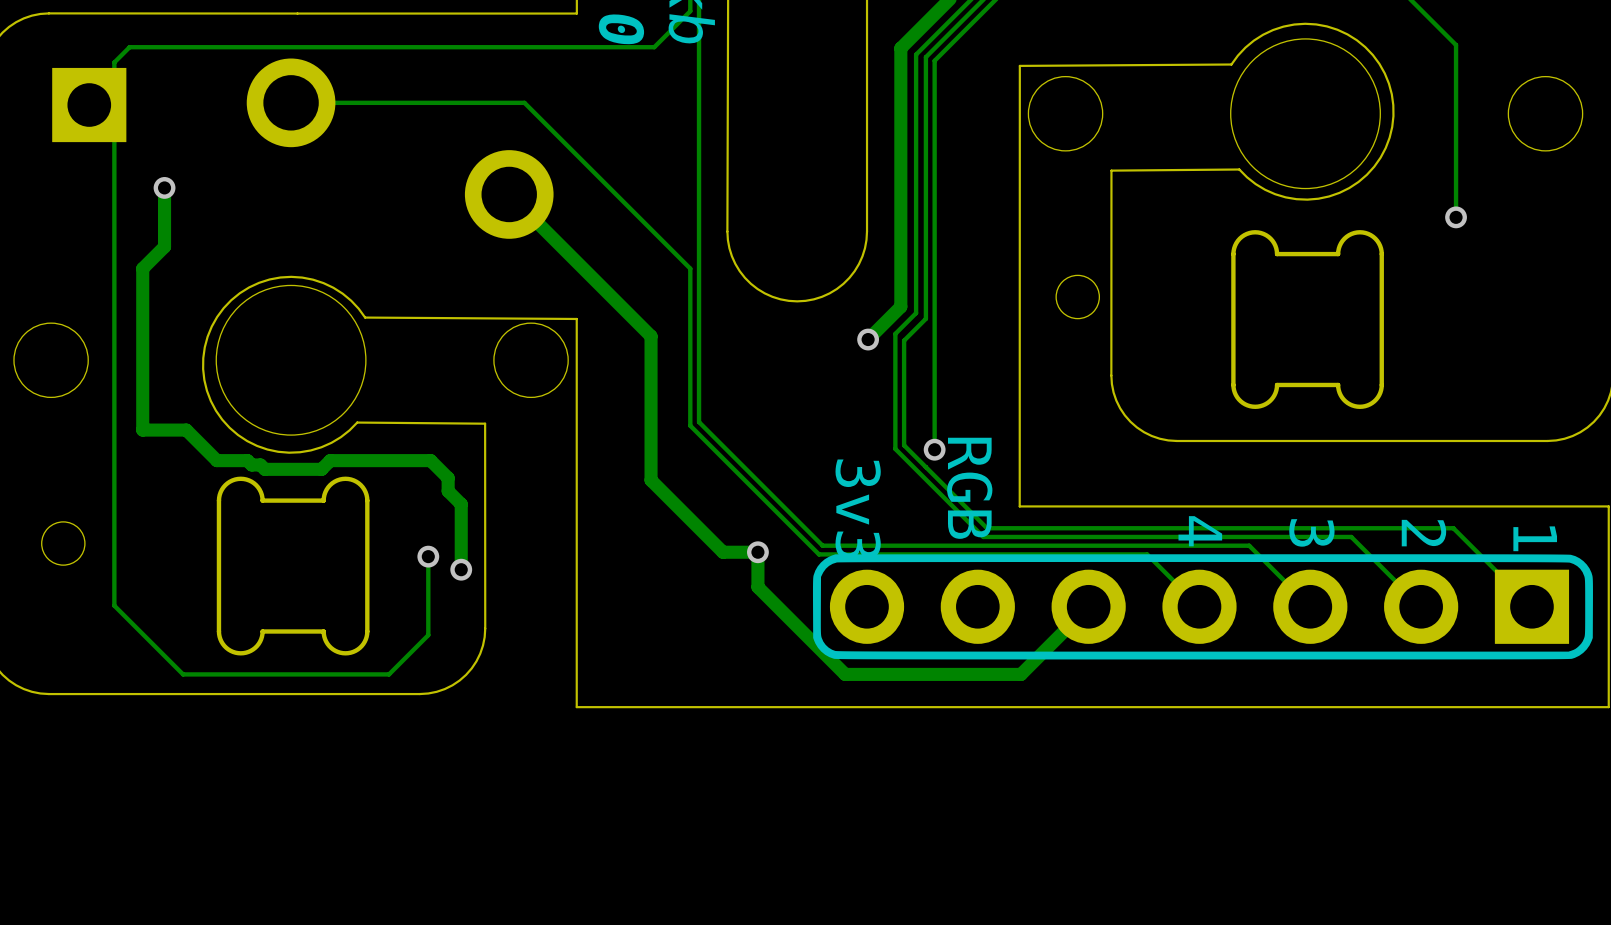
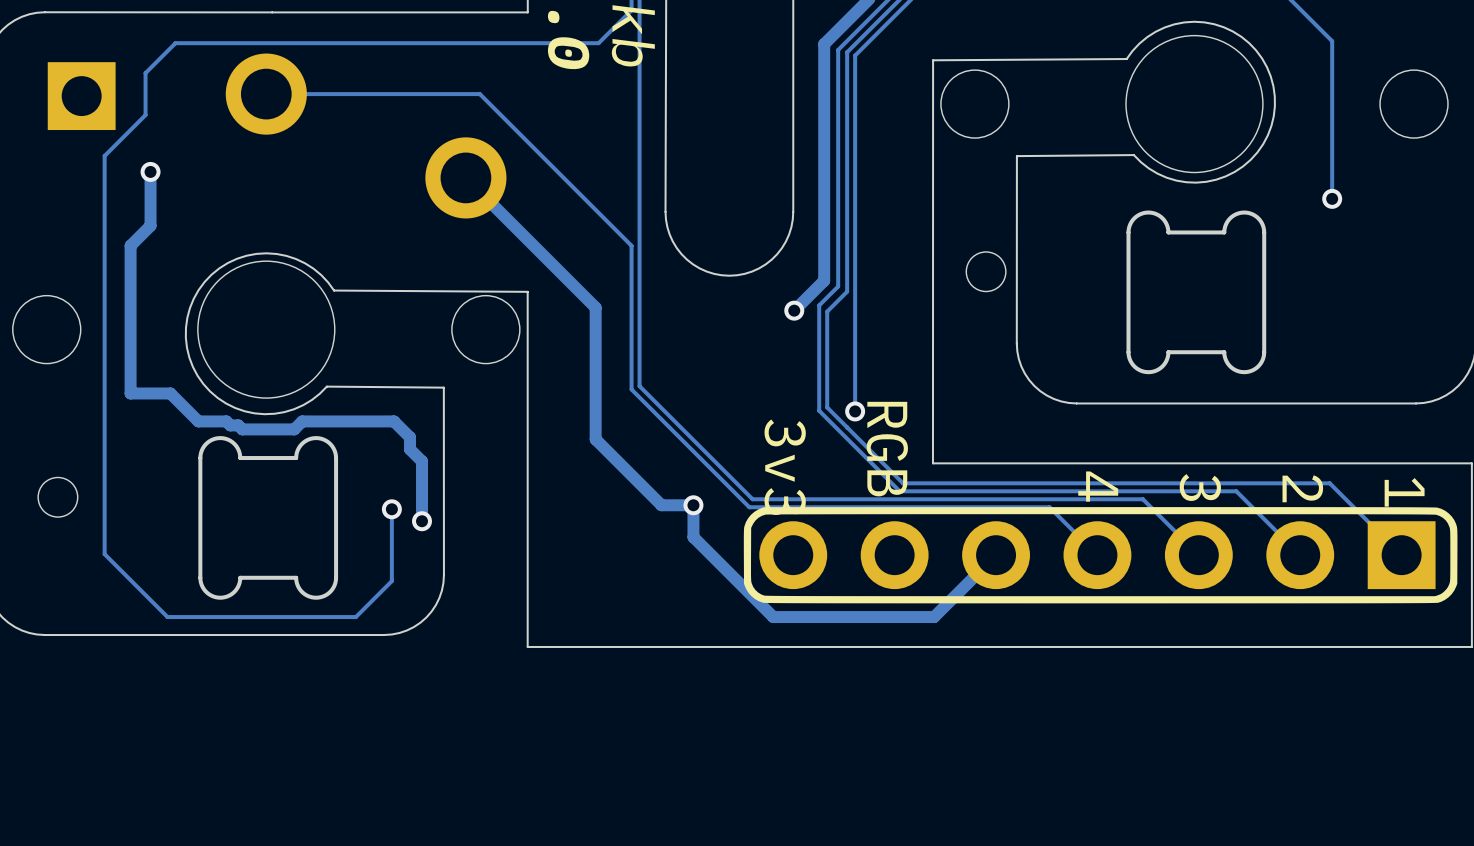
track: (191, 47) (129, 47) (114, 62) (114, 170) -> (175, 43) (145, 73) (145, 115) (104, 155)

